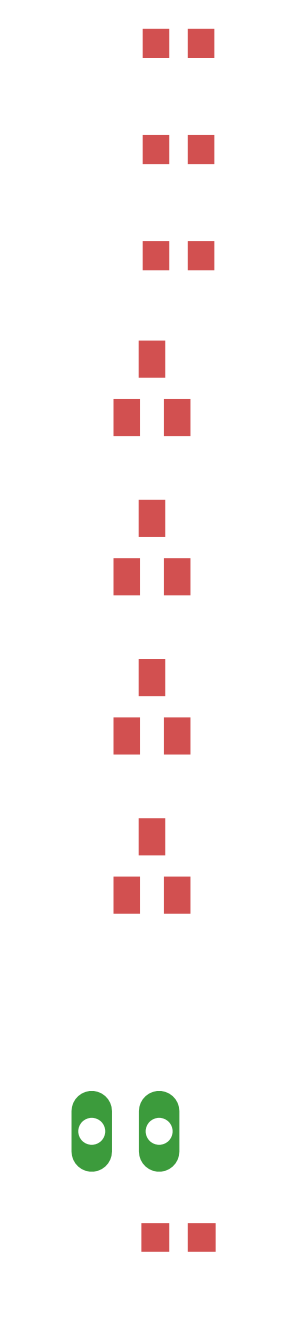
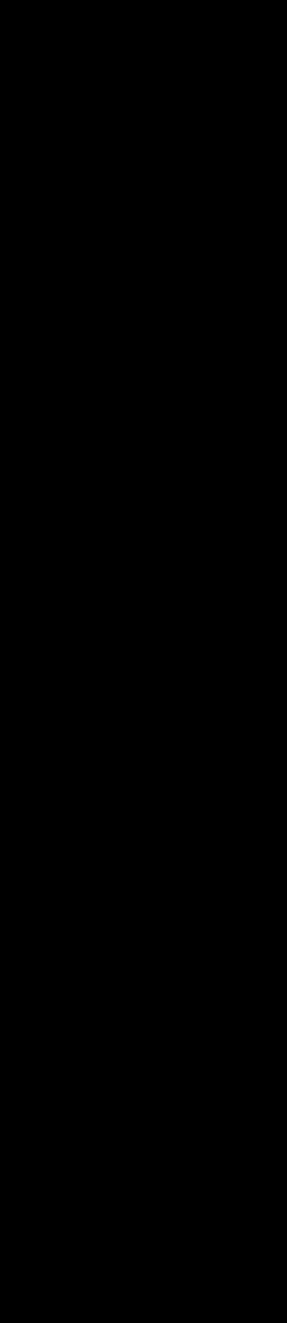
part: (178, 43) -> none
part: (178, 149) -> none
part: (178, 255) -> none
part: (151, 388) -> none
part: (151, 547) -> none
part: (151, 706) -> none
part: (151, 865) -> none
part: (125, 1131) -> none
part: (178, 1237) -> none

